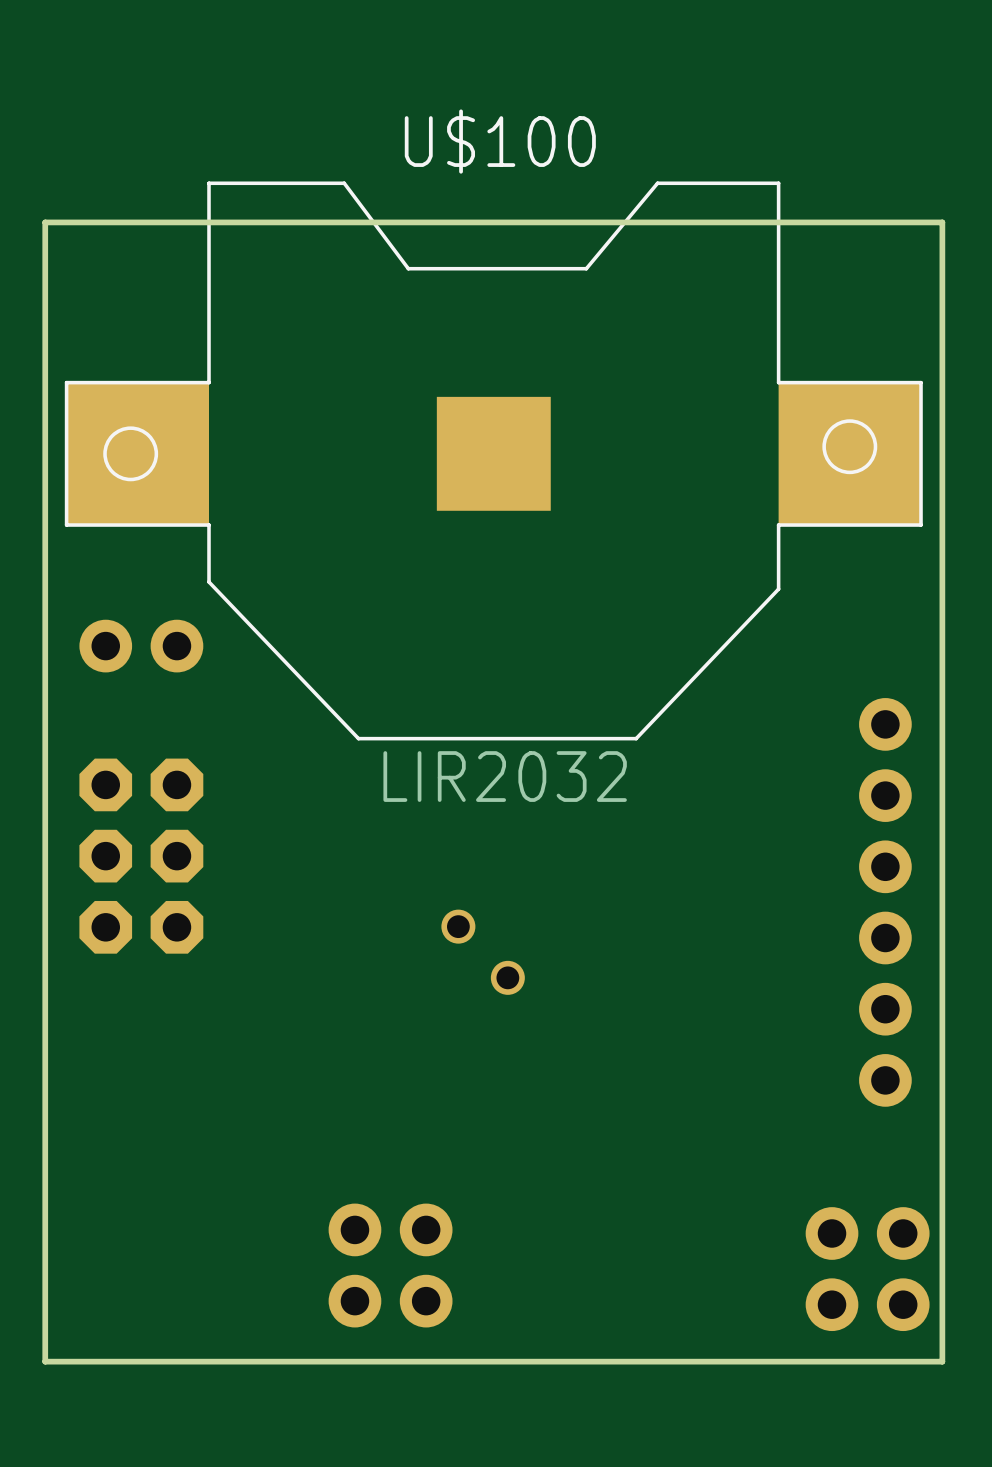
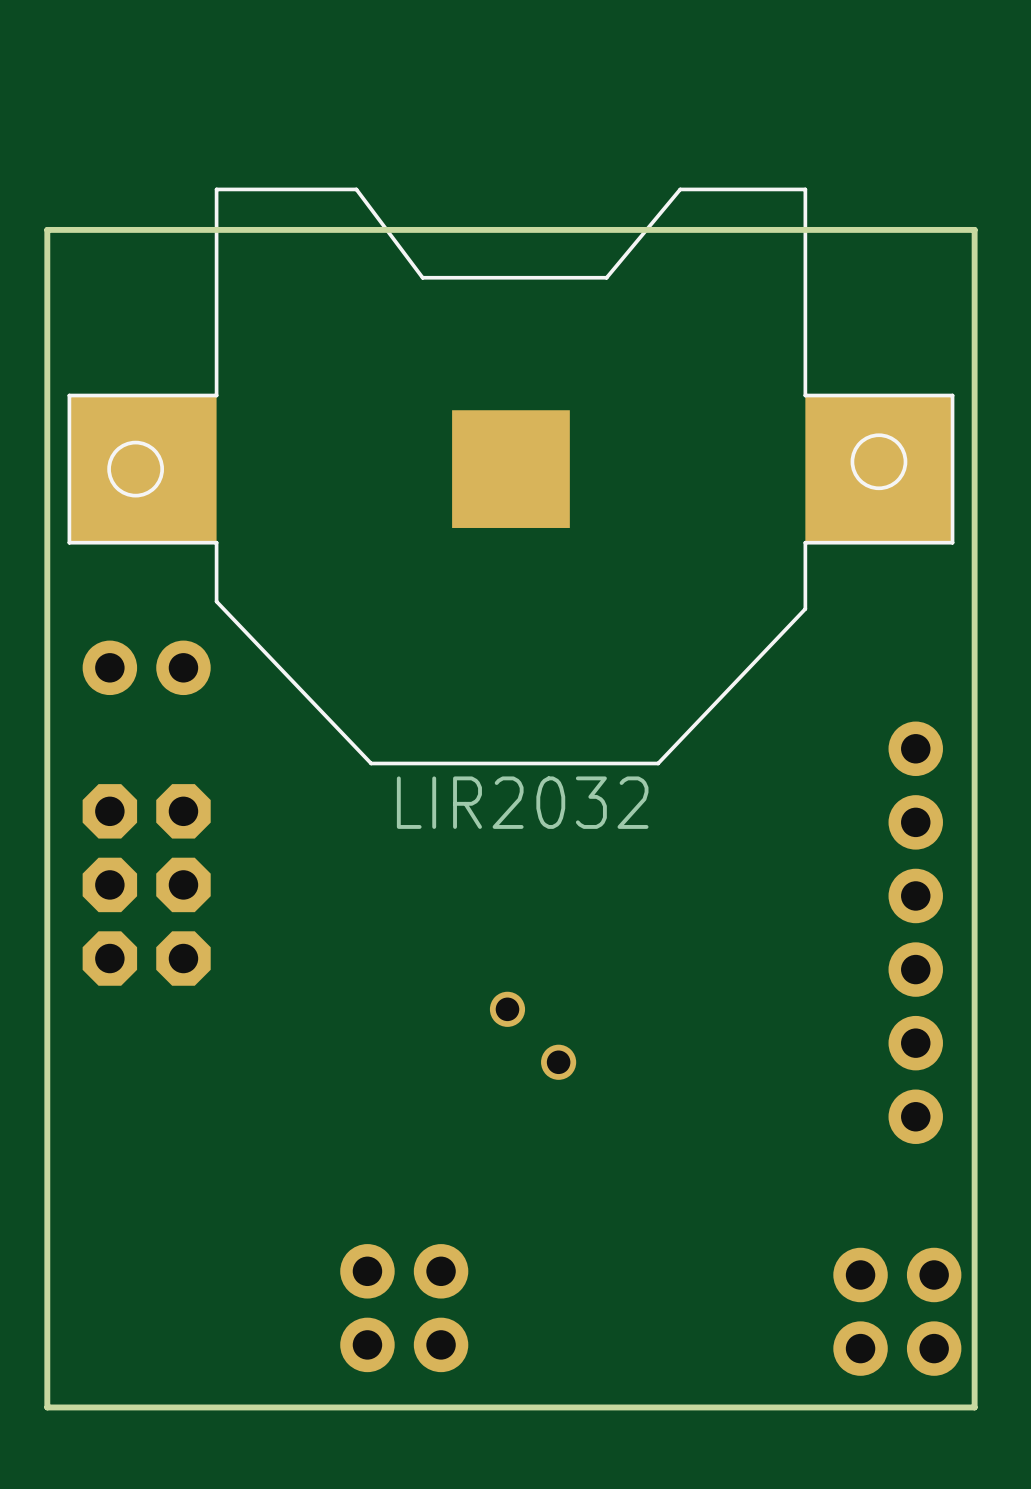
U$100 name: U$100 (500, 141) -> none
part position: (483, 952) -> (533, 1035)

